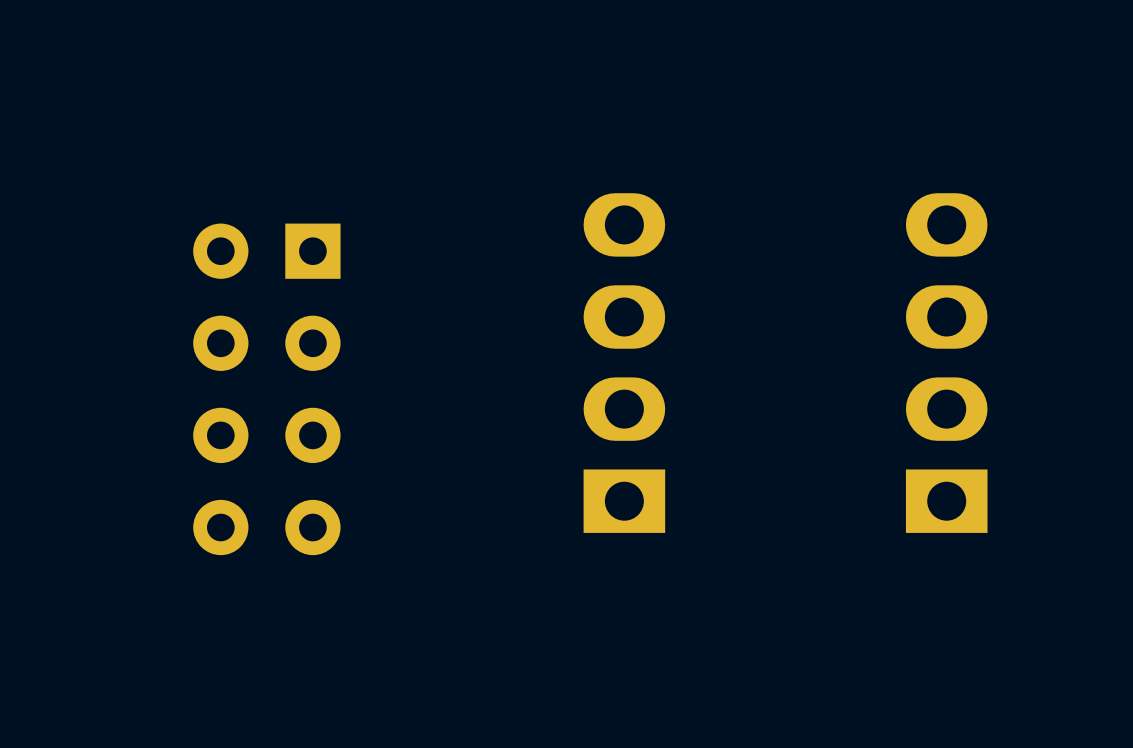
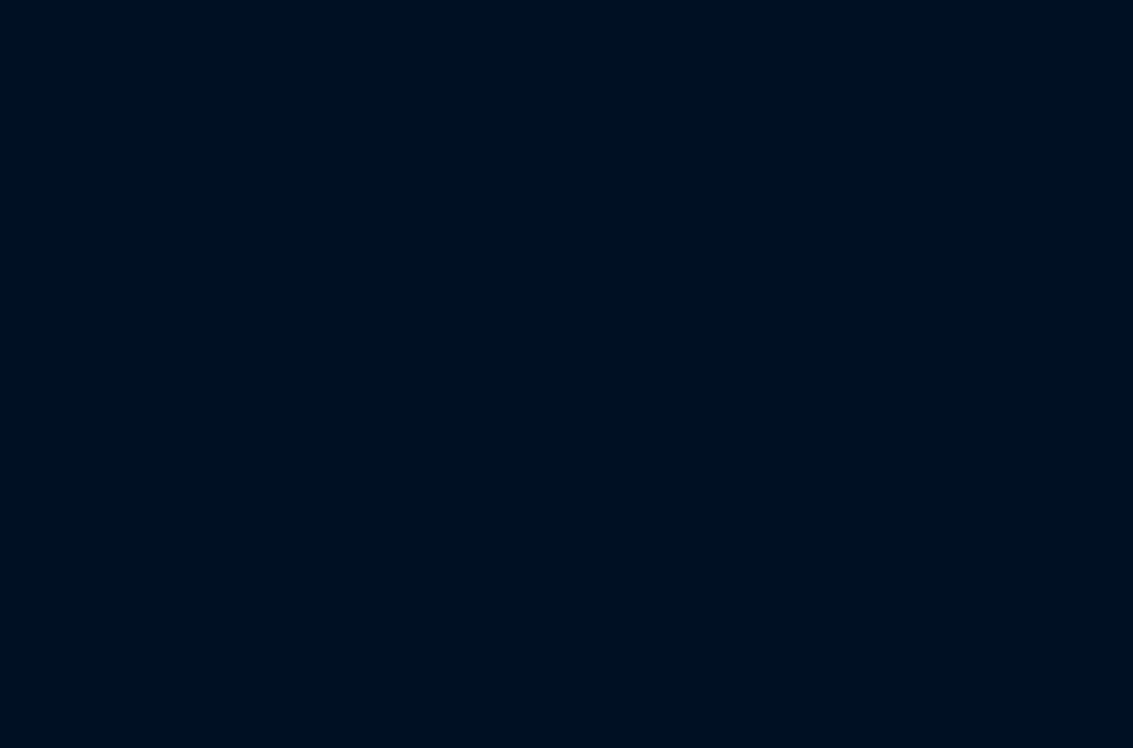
part: (624, 363) -> none
part: (946, 363) -> none
part: (266, 389) -> none

